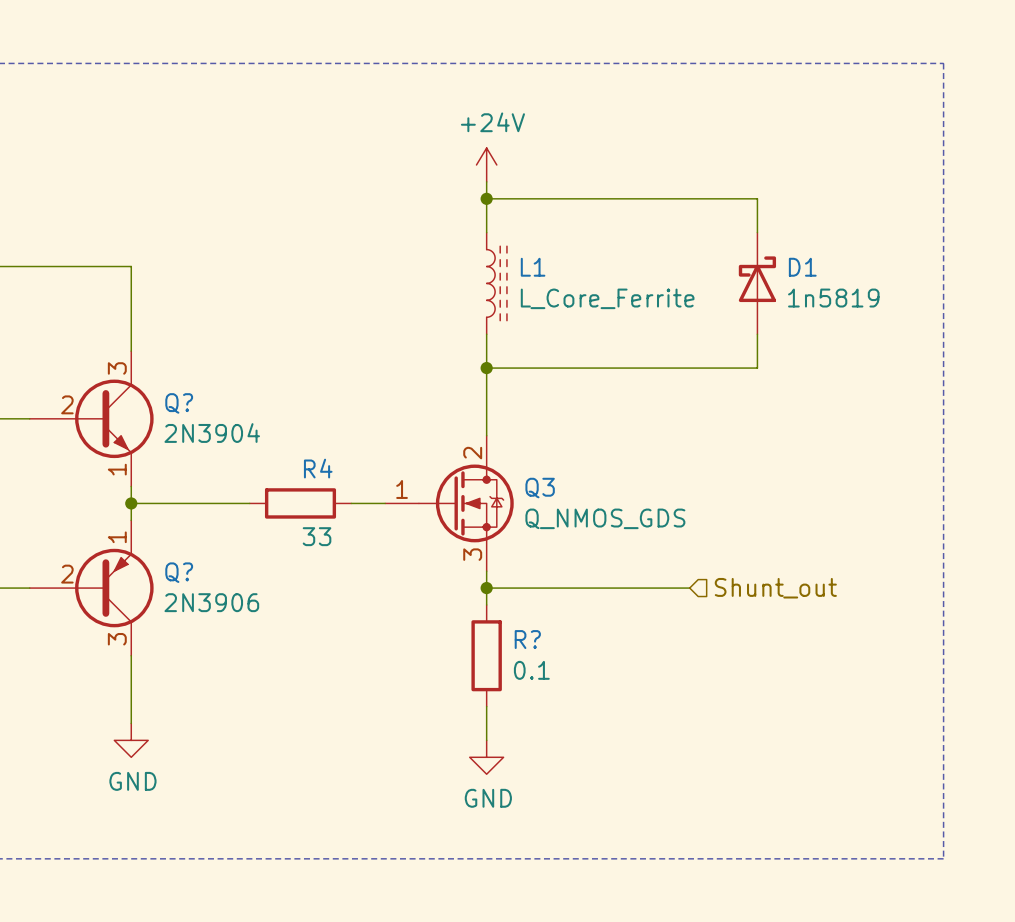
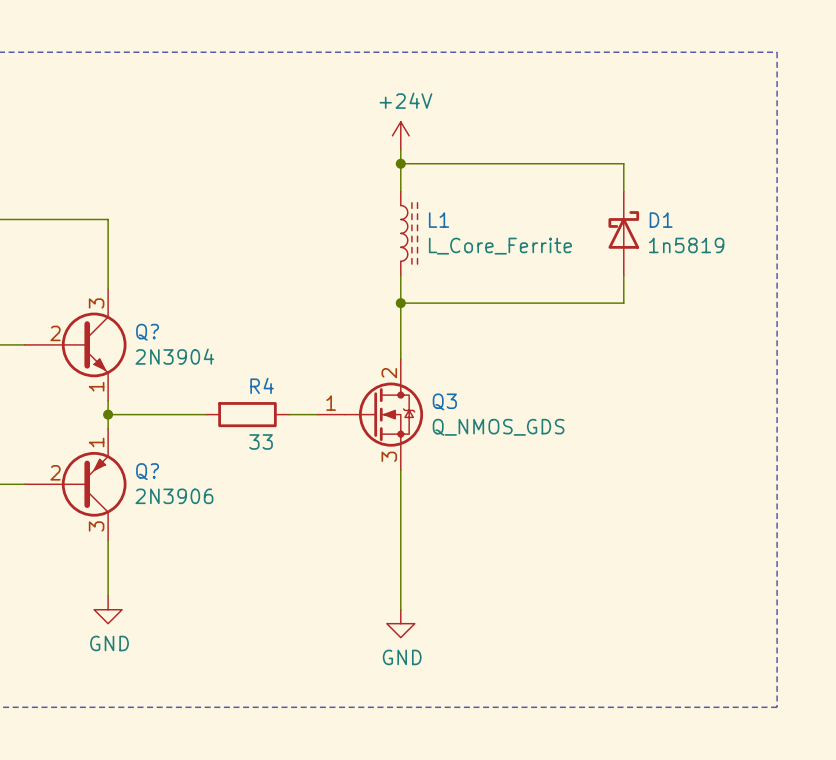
wire: (486, 588) (689, 588) -> none
junction: (486, 588) -> none
hierarchical label: Shunt_out (775, 588) -> none
wire: none -> (400, 498) (400, 581)
R?: 0.1 (486, 655) -> none

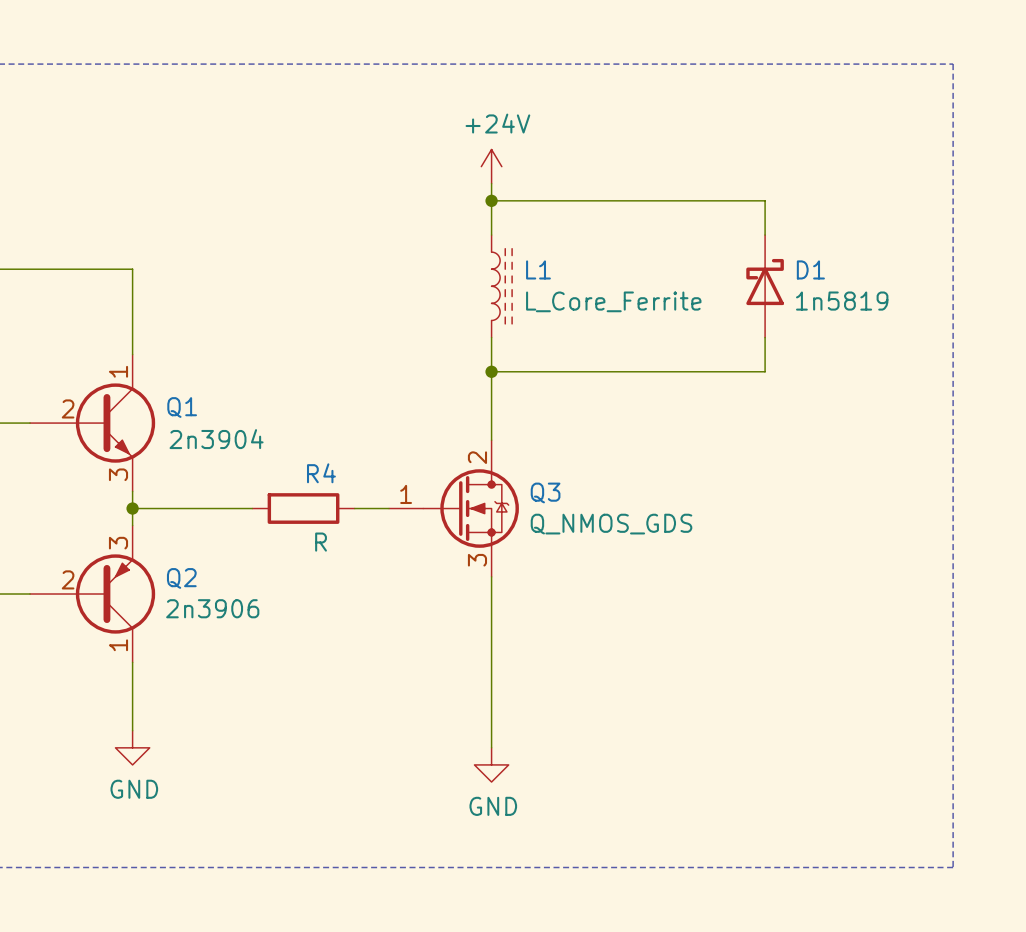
Q? pin number: 3 (96, 303) -> 1 (118, 371)
Q? name: Q? (147, 332) -> Q1 (182, 407)
Q? value: 2N3904 (174, 356) -> 2n3904 (216, 439)
Q? pin number: 1 (96, 386) -> 3 (118, 474)
R4 value: 33 (261, 441) -> R (321, 542)
Q? pin number: 1 (96, 442) -> 3 (118, 543)
Q? name: Q? (147, 471) -> Q2 (181, 578)
Q? value: 2N3906 (174, 496) -> 2n3906 (212, 608)
Q? pin number: 3 (96, 526) -> 1 (118, 645)

